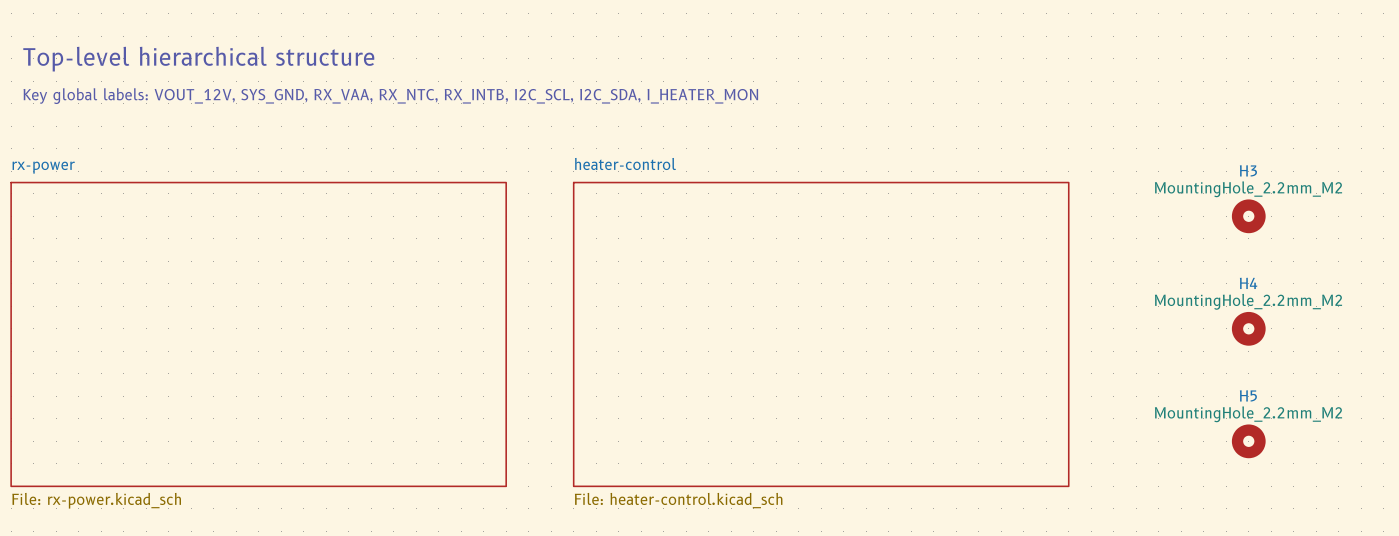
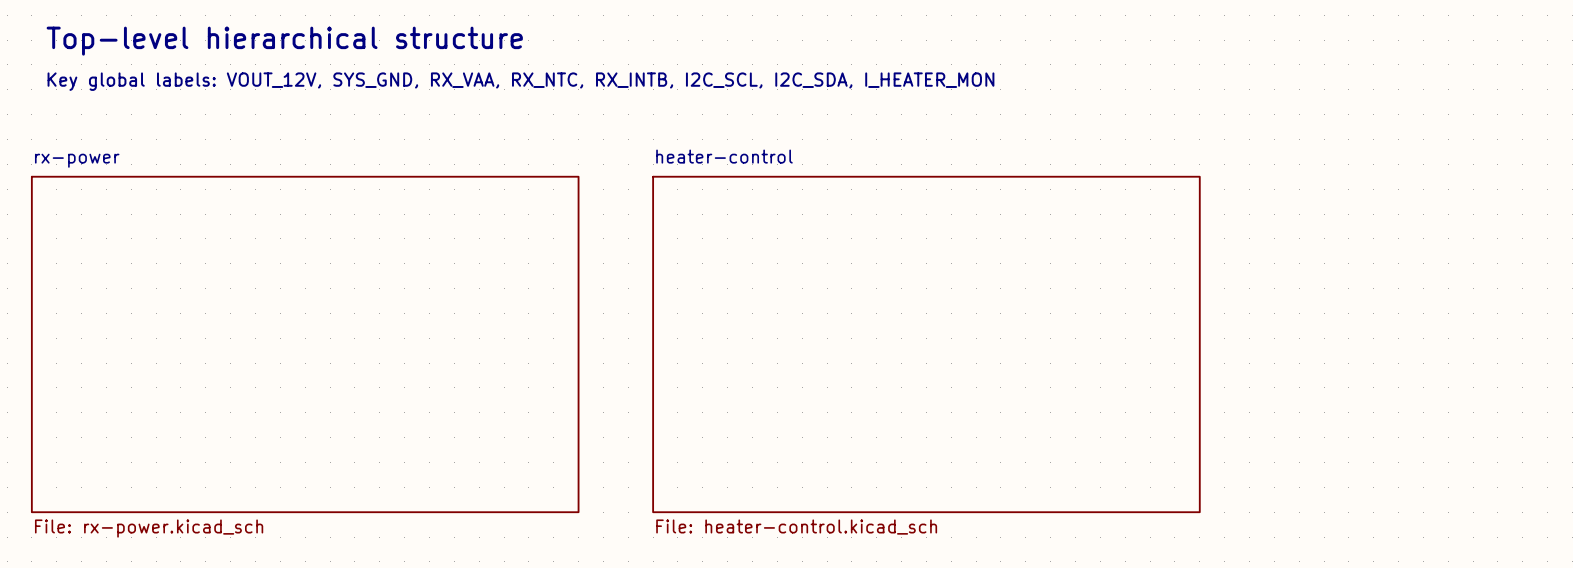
H3: MountingHole_2.2mm_M2 (1248, 216) -> none
H4: MountingHole_2.2mm_M2 (1248, 328) -> none
H5: MountingHole_2.2mm_M2 (1248, 441) -> none

